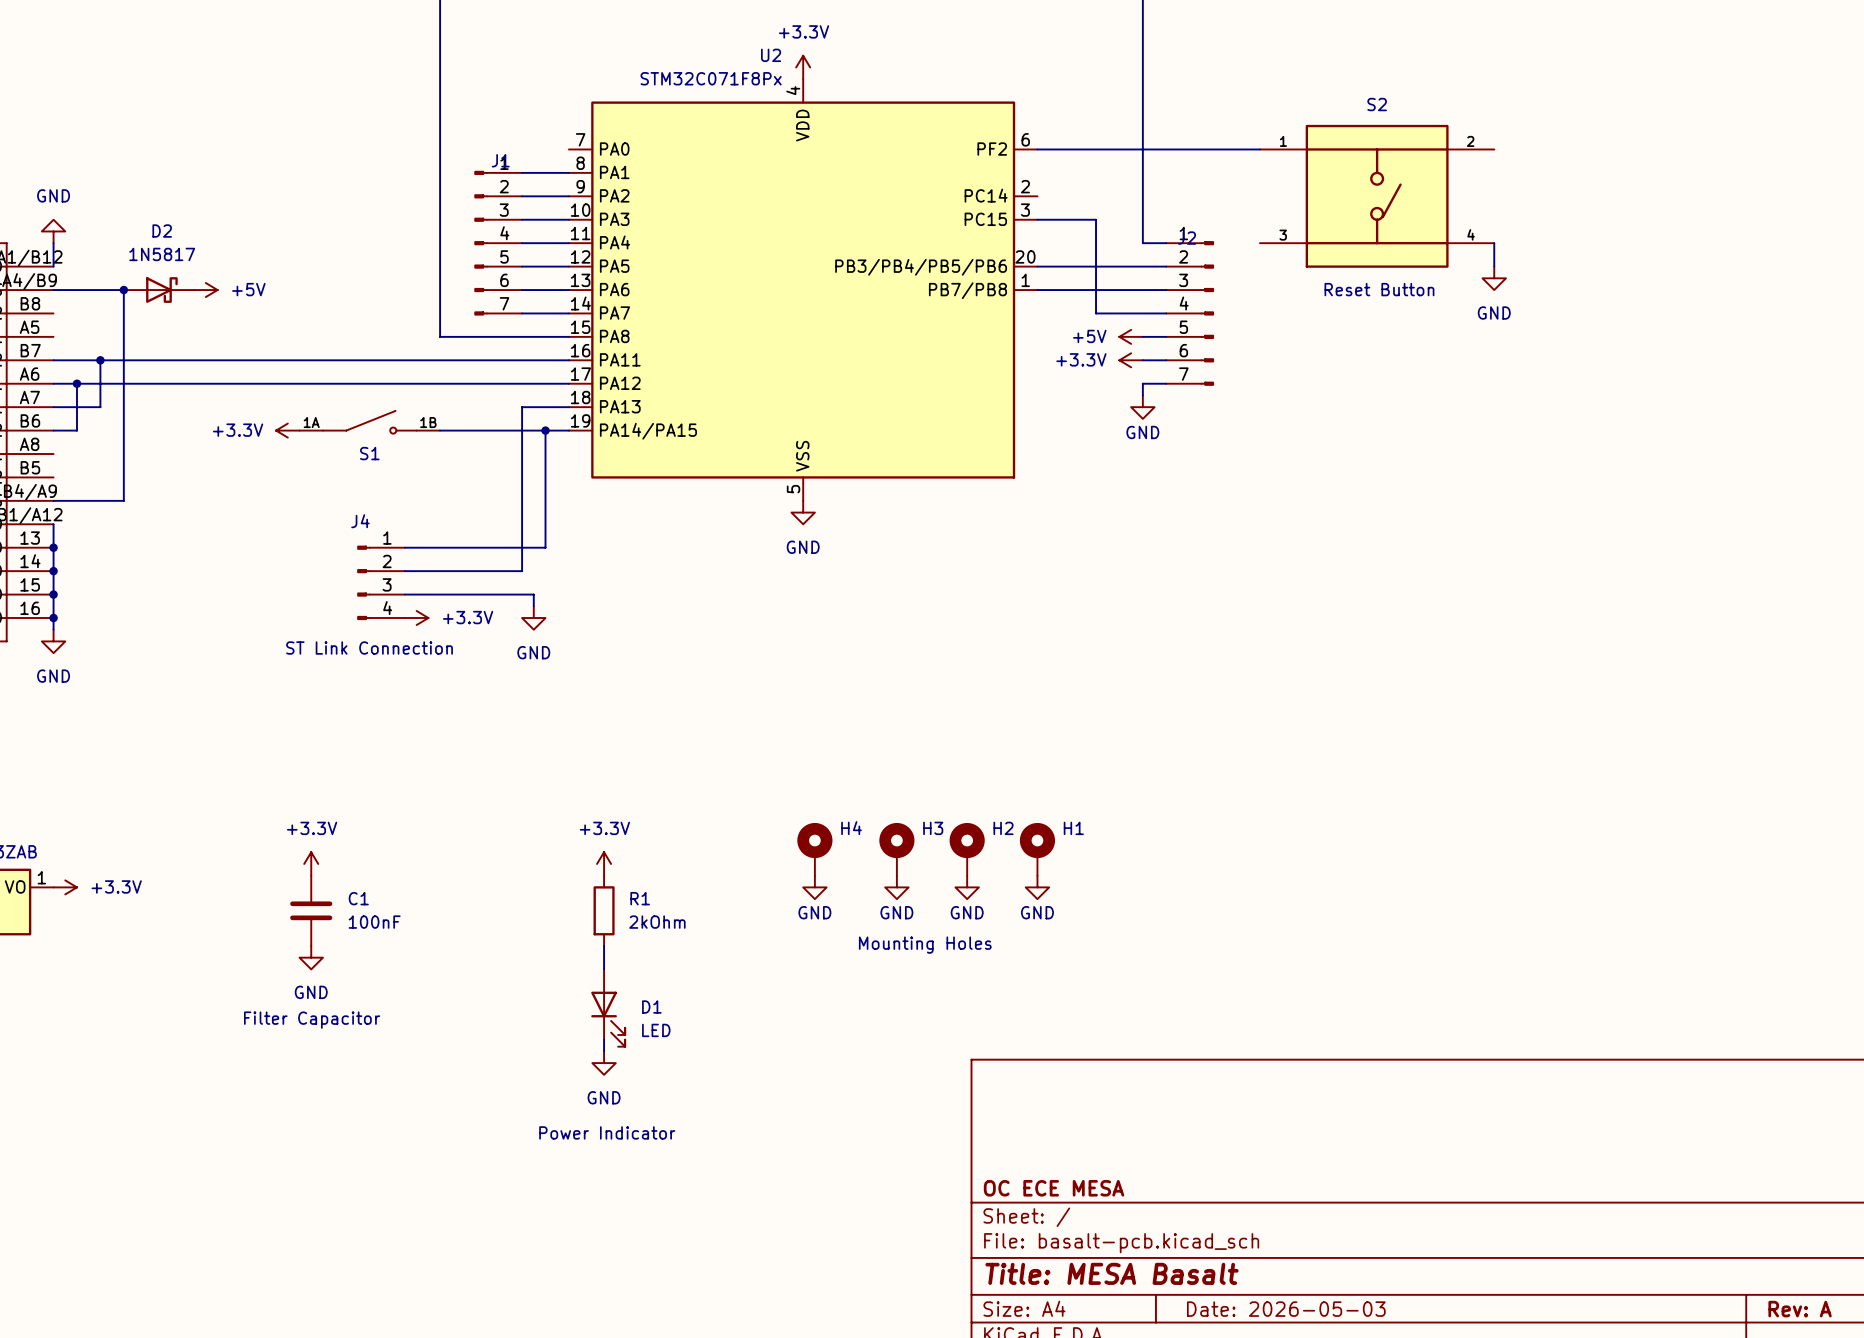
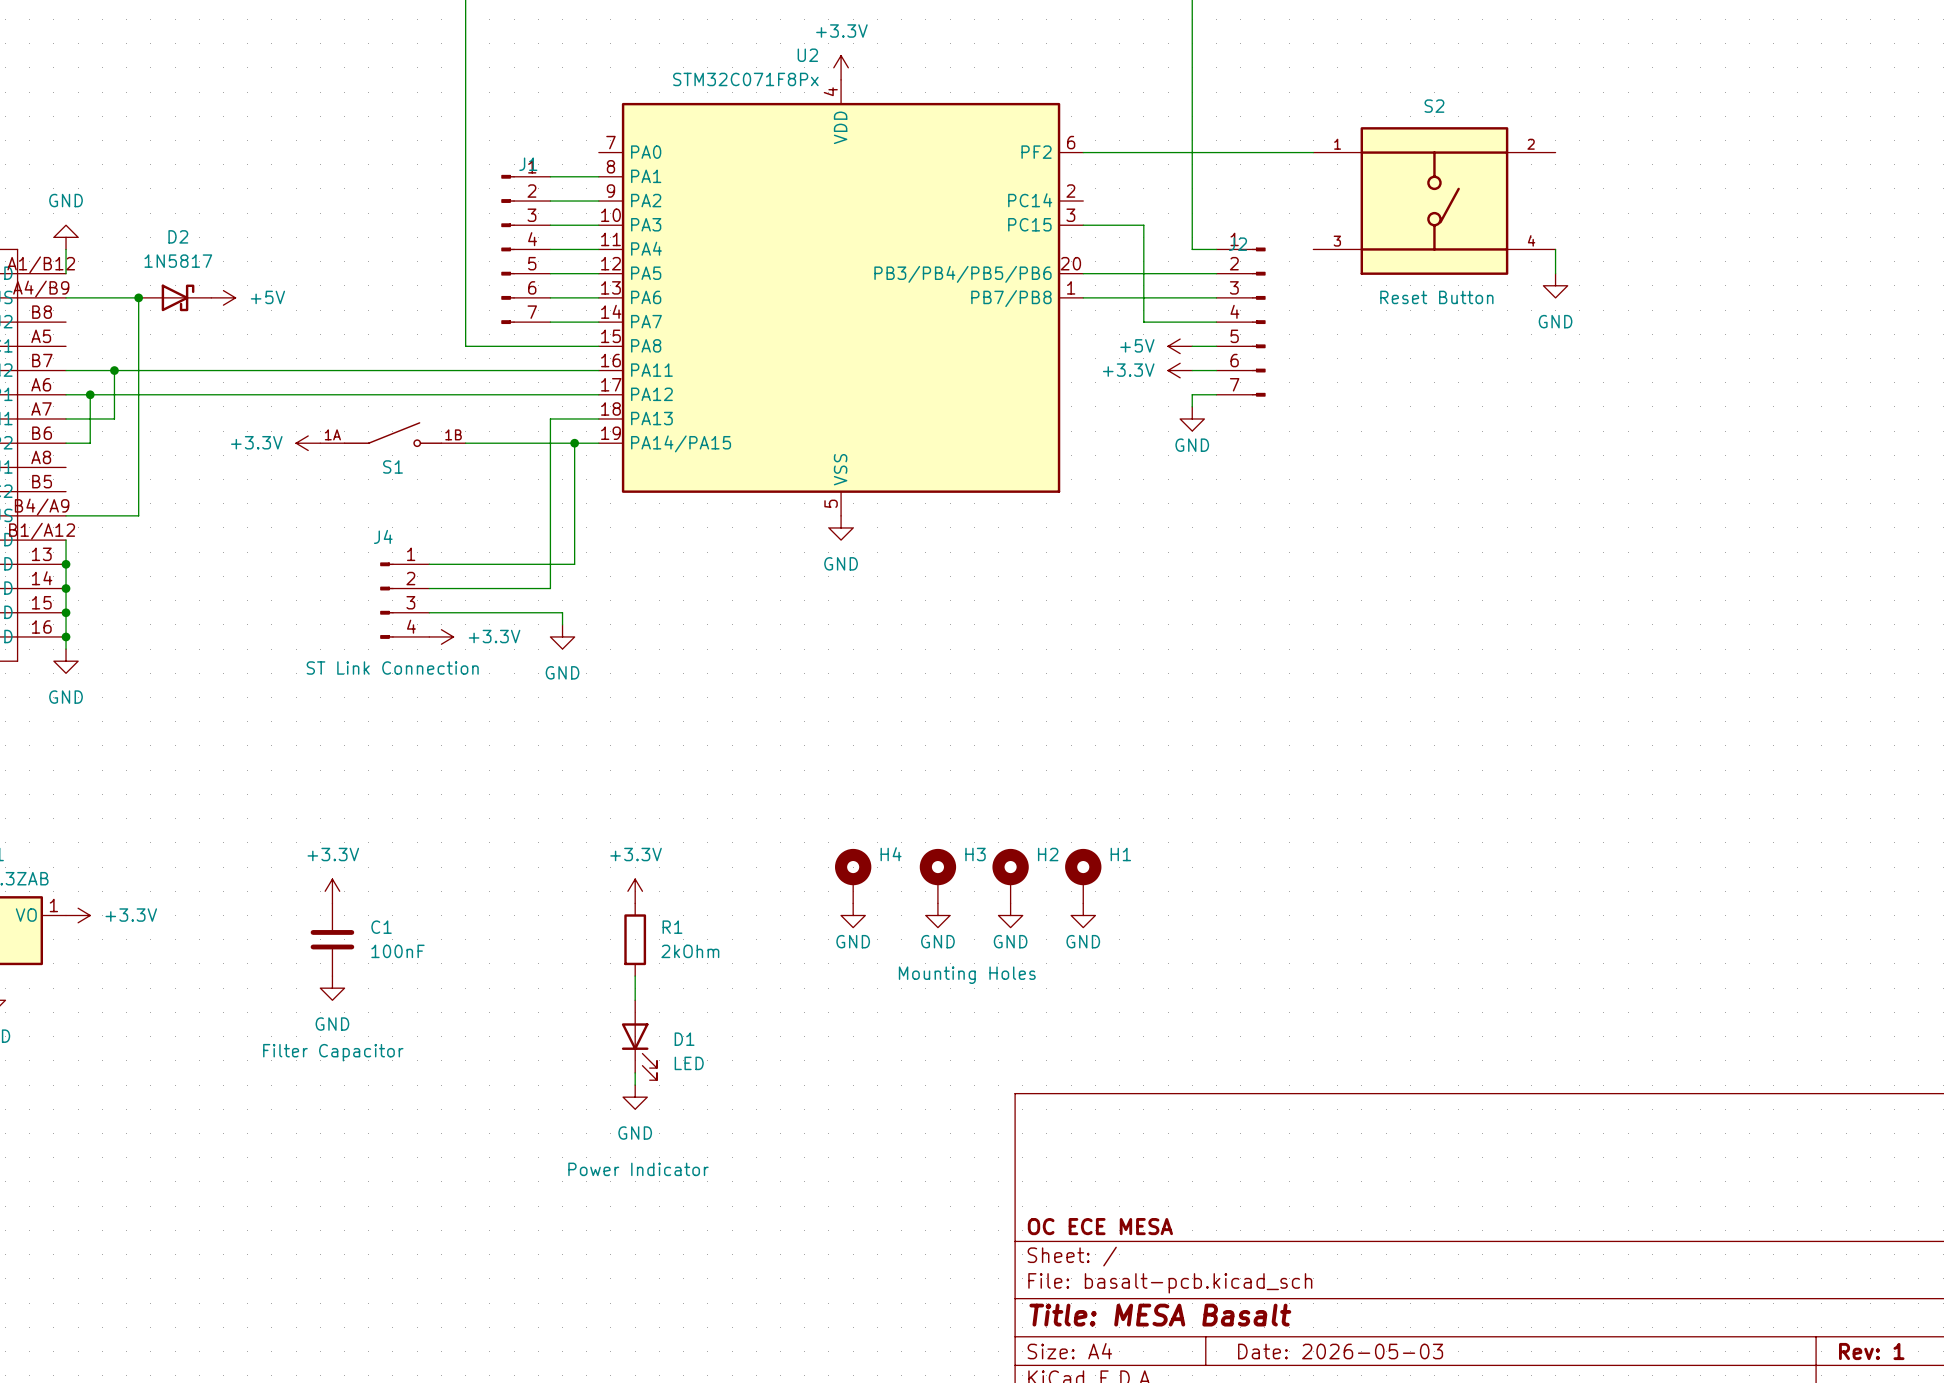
title block: Rev: A (1800, 1309) -> Rev: 1 (1871, 1351)

